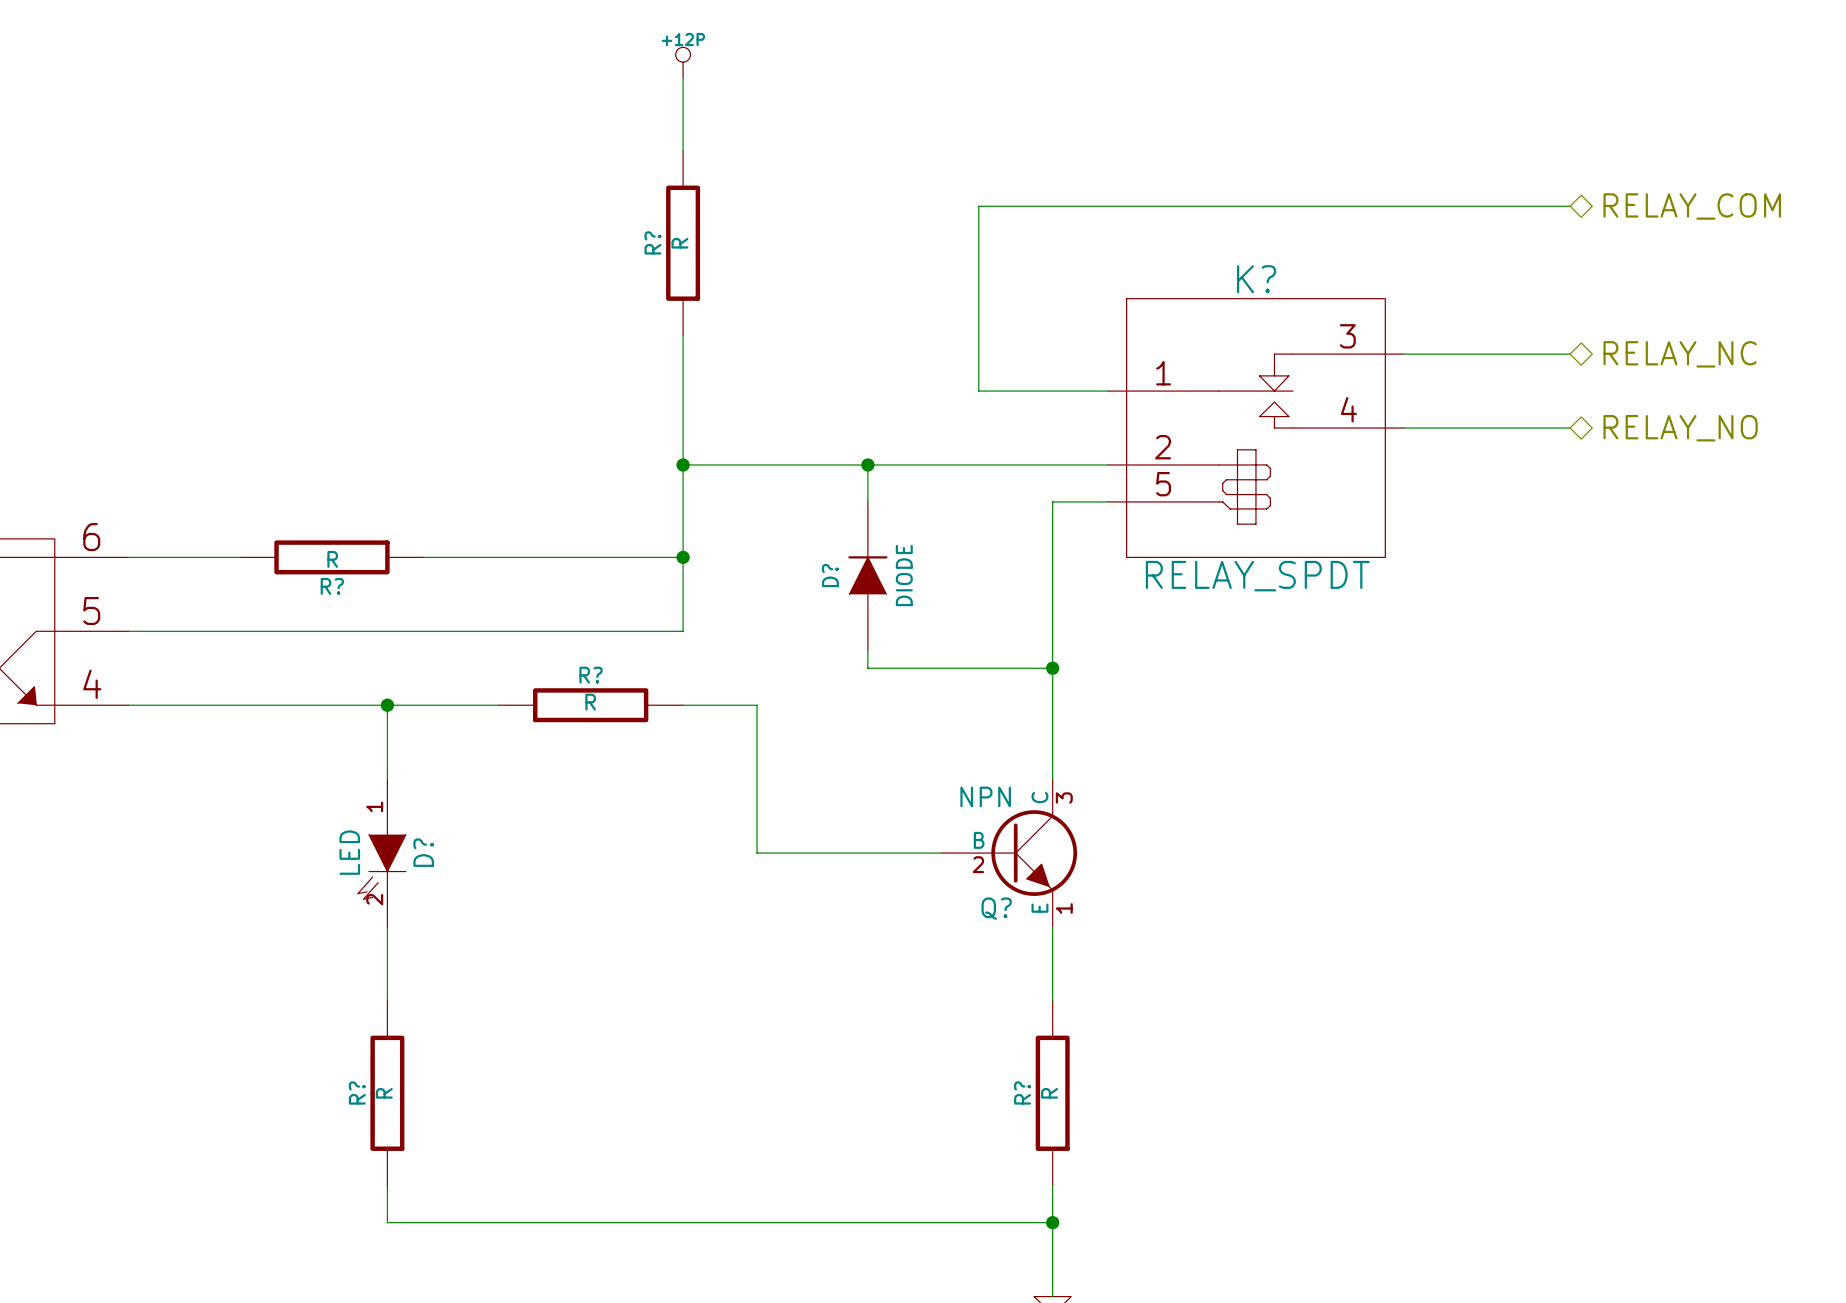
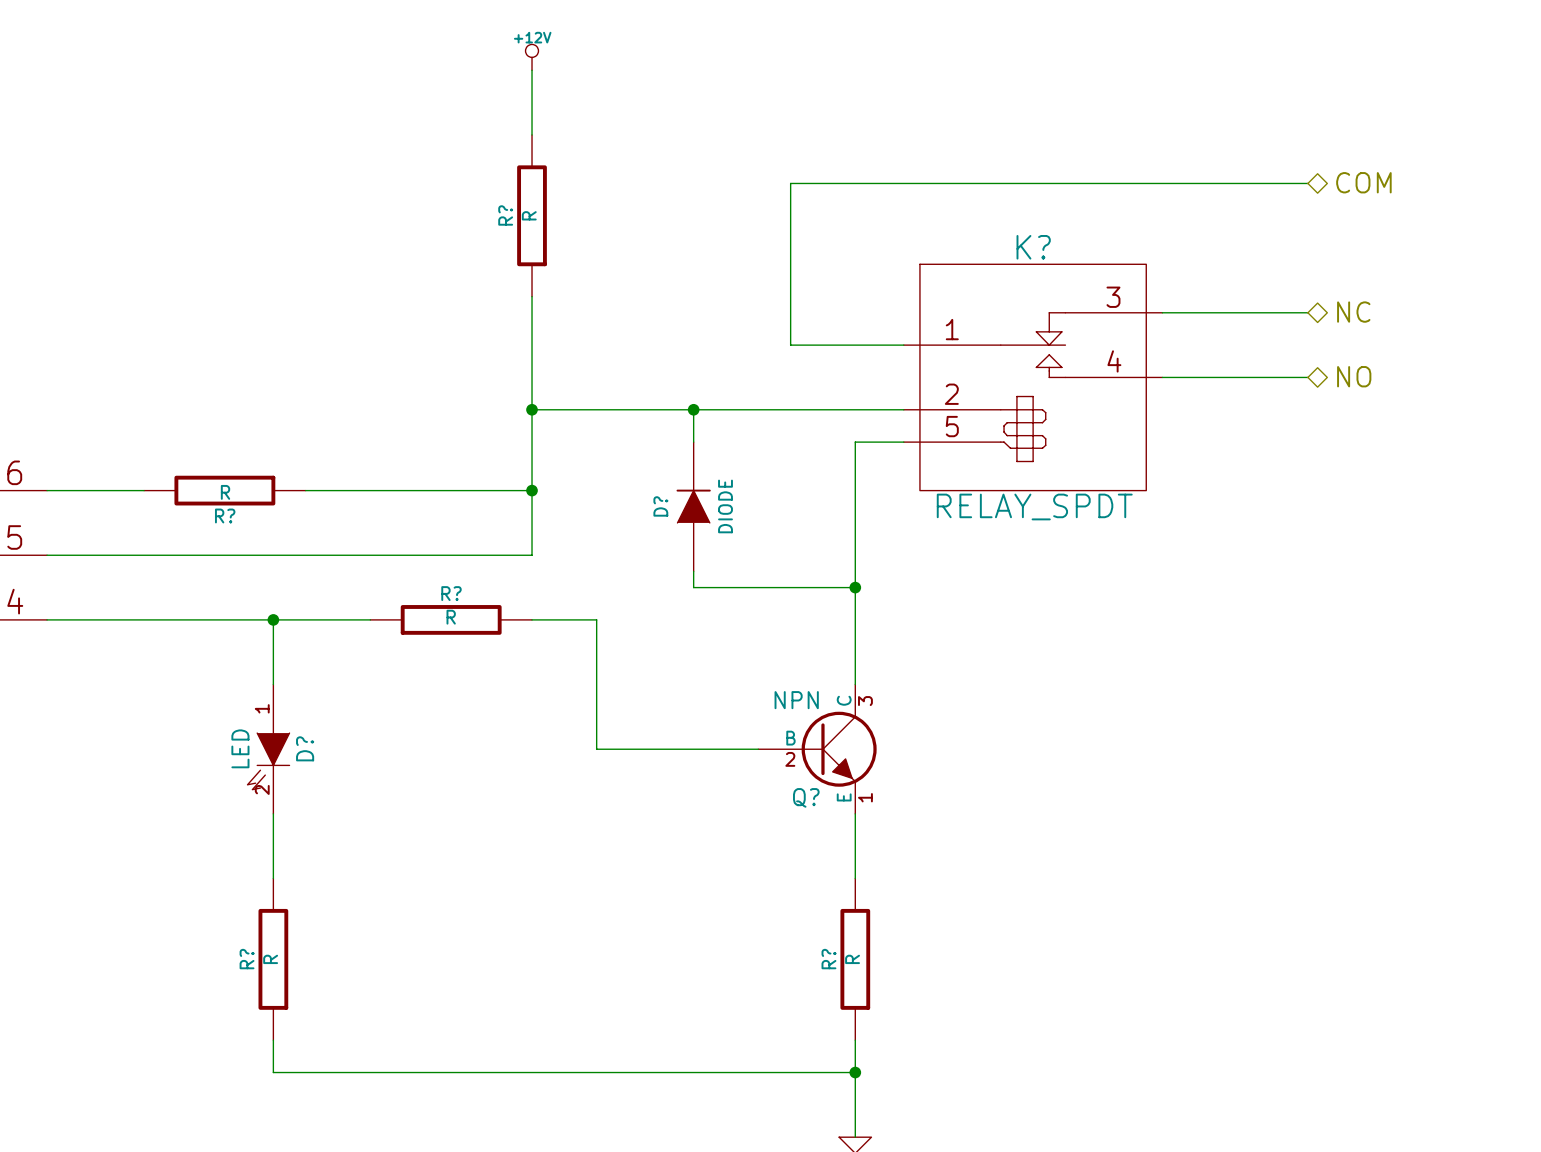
power symbol: +12P (683, 62) -> +12V (532, 57)
hierarchical label: RELAY_COM (1692, 206) -> COM (1363, 182)
hierarchical label: RELAY_NC (1680, 354) -> NC (1353, 312)
hierarchical label: RELAY_NO (1680, 428) -> NO (1354, 376)

